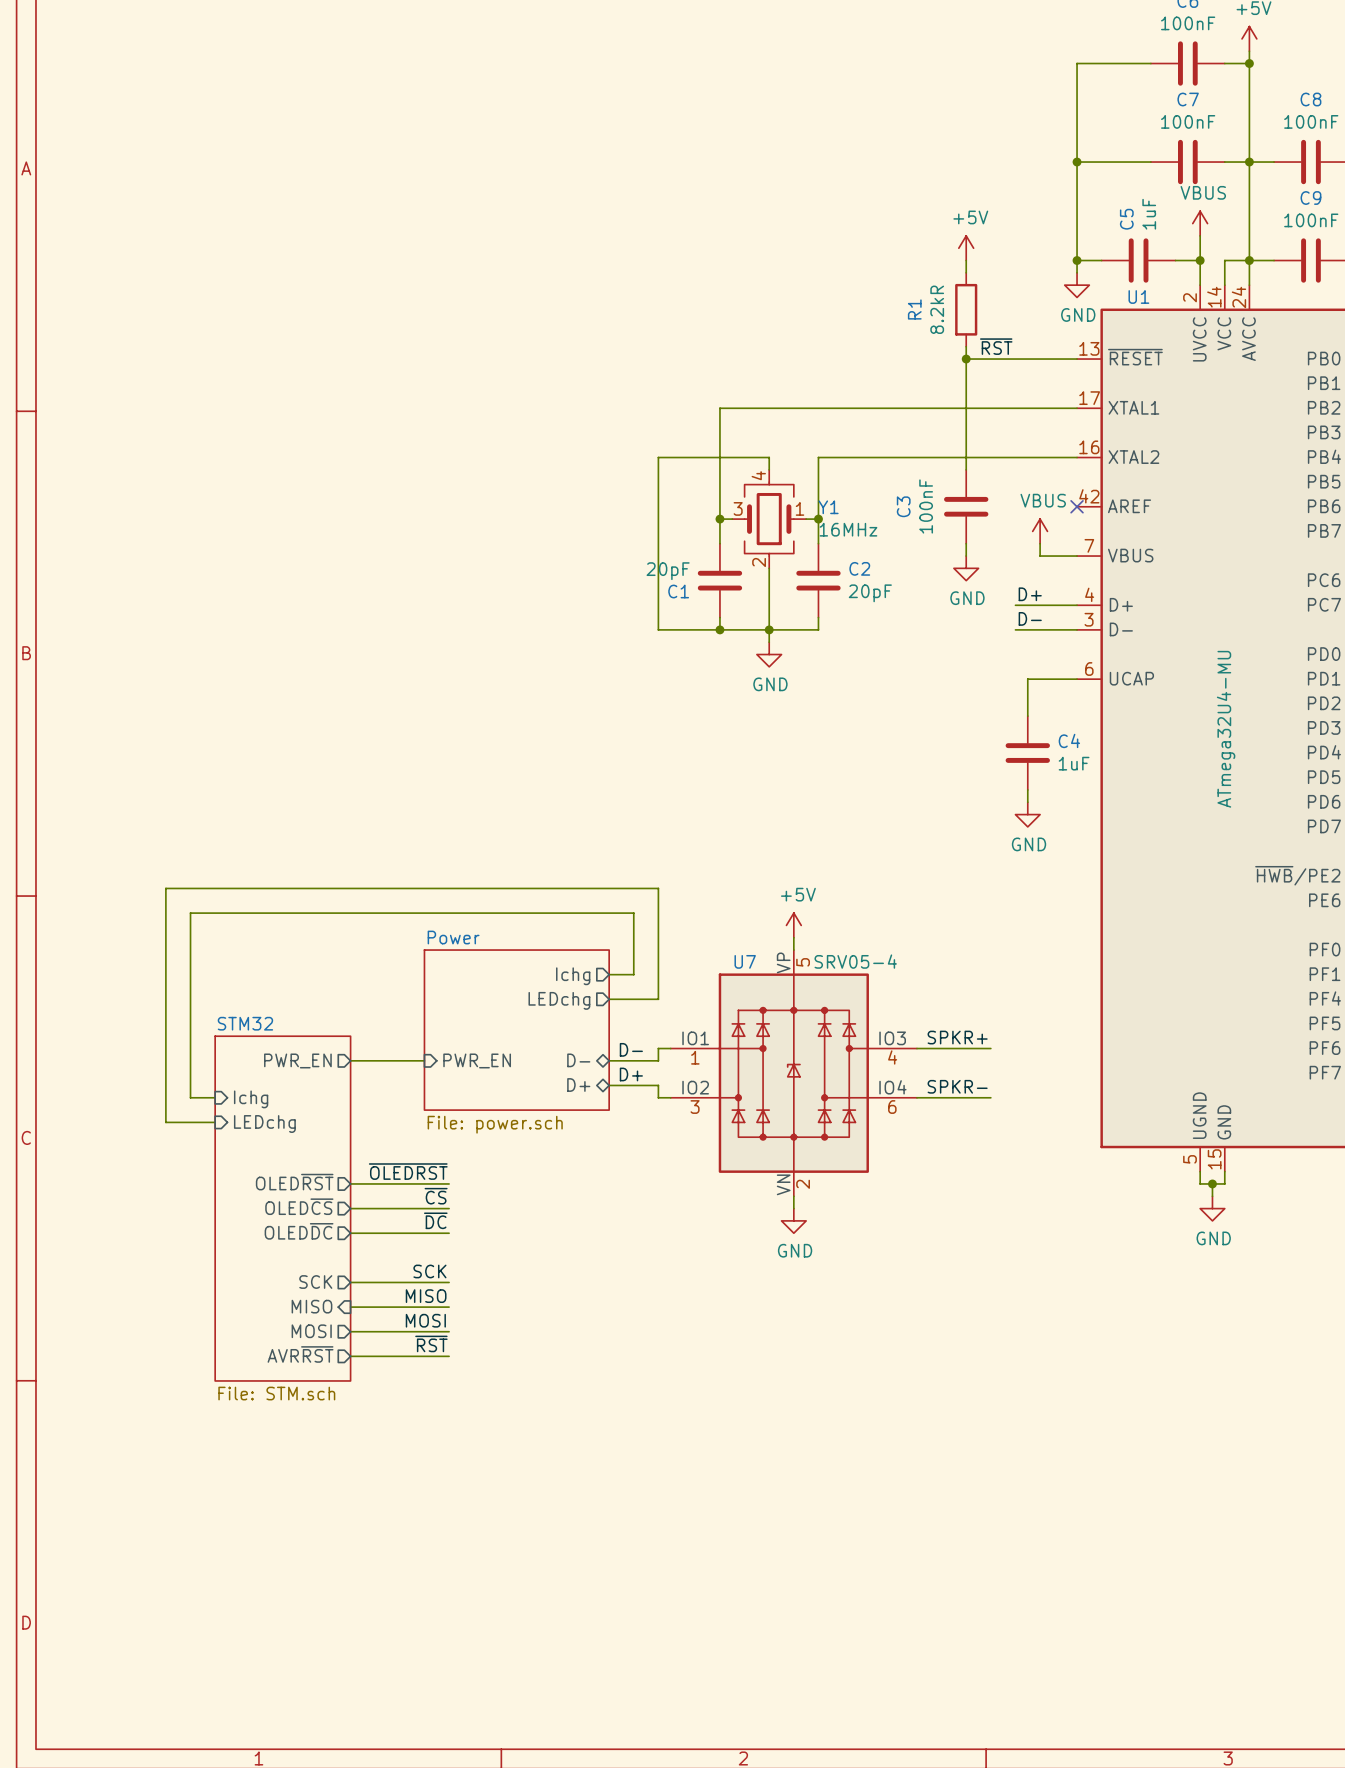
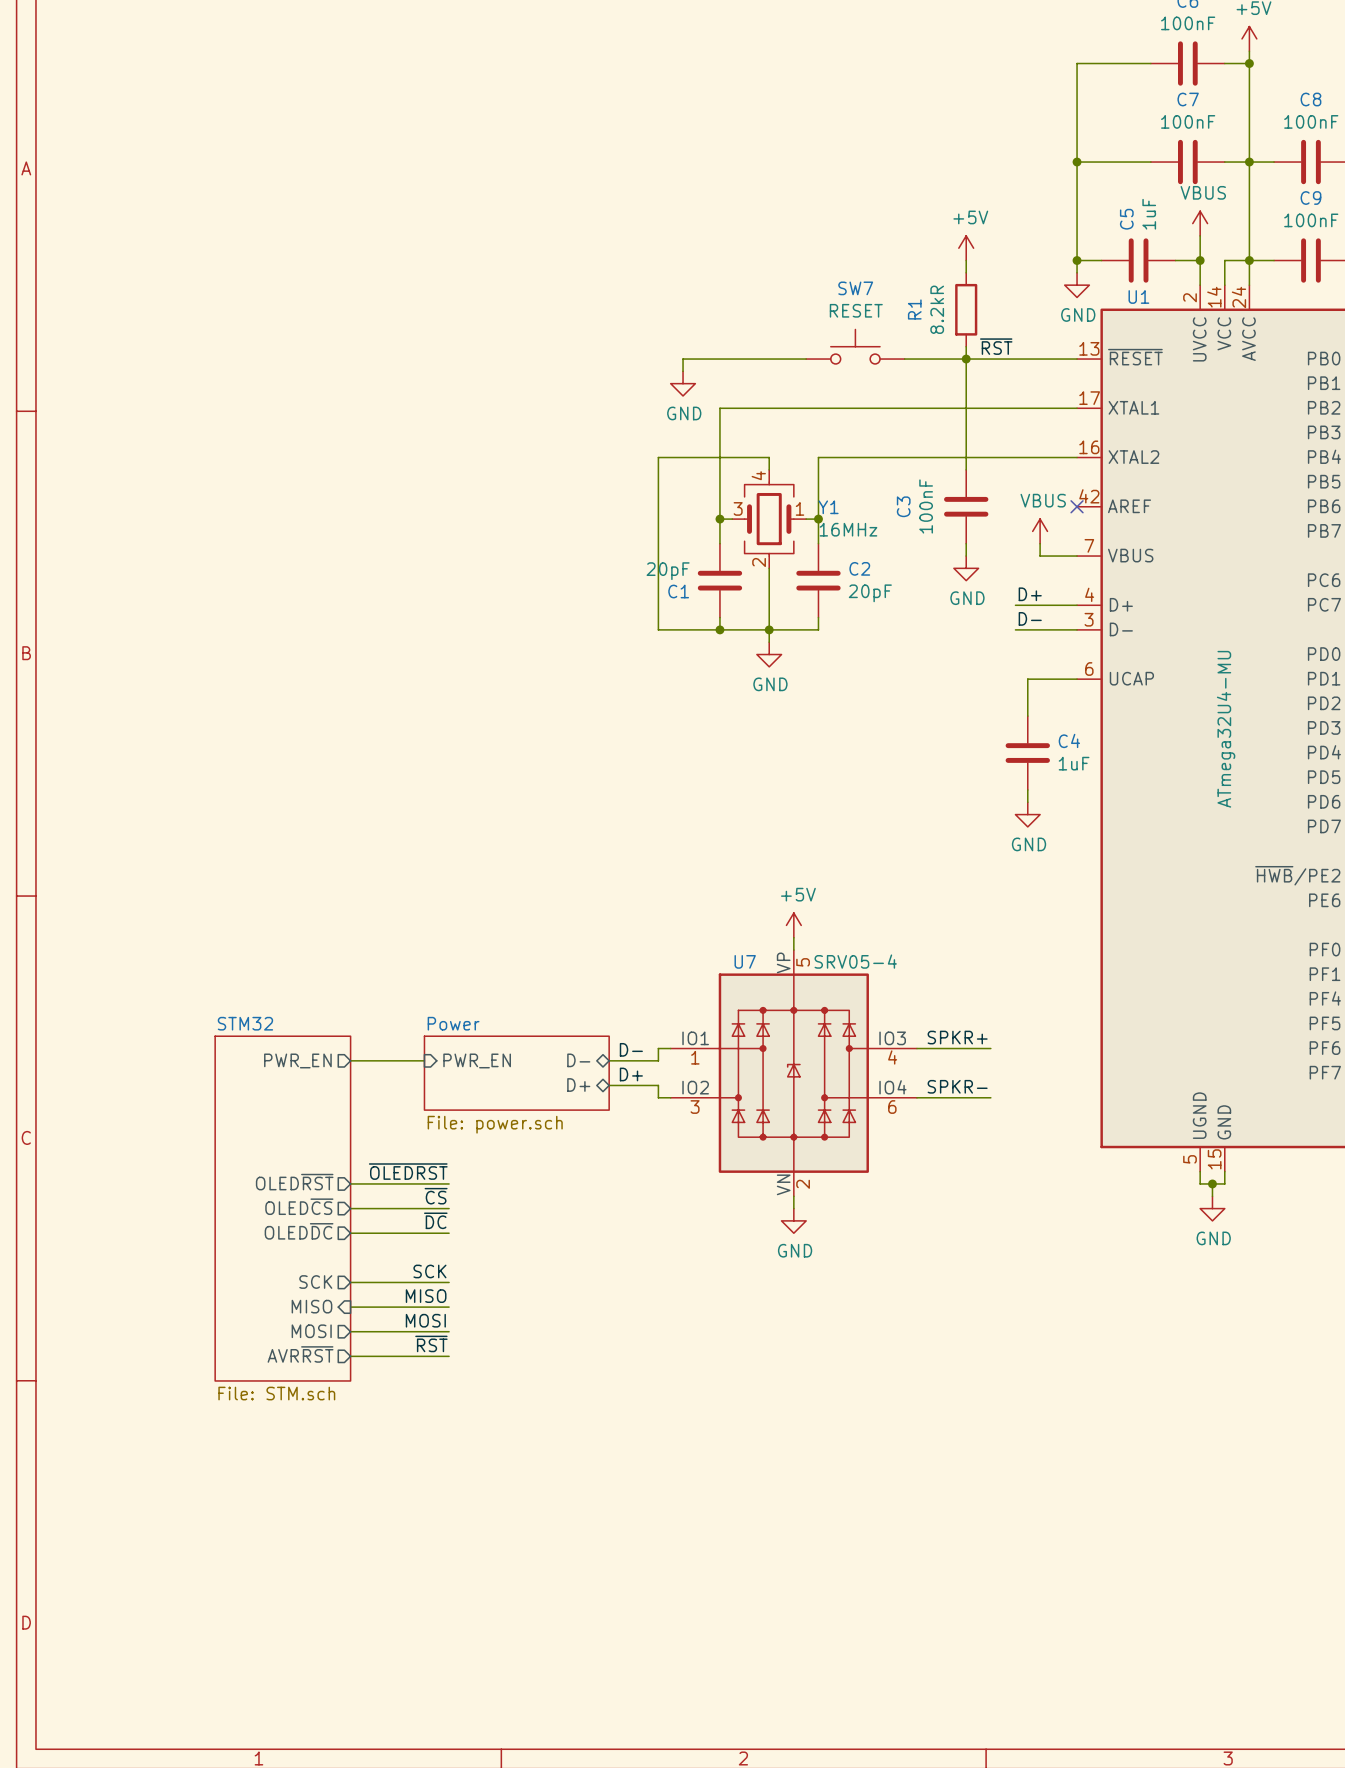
SW7: none -> RESET (855, 346)
wire: none -> (806, 359) (683, 359) (683, 371)
wire: none -> (904, 359) (966, 359)
power symbol: none -> GND (683, 383)
wire: (609, 974) (633, 974) (633, 913) (190, 913) (190, 1097) (215, 1097) -> none
sheet pin: Ichg (573, 976) -> none
wire: (609, 999) (658, 999) (658, 888) (165, 888) (165, 1122) (215, 1122) -> none
sheet pin: LEDchg (559, 1000) -> none
sheet Power: File: power.sch (516, 1030) -> none
sheet Power: none -> File: power.sch (516, 1073)
sheet pin: Ichg (251, 1099) -> none
sheet pin: LEDchg (264, 1124) -> none

